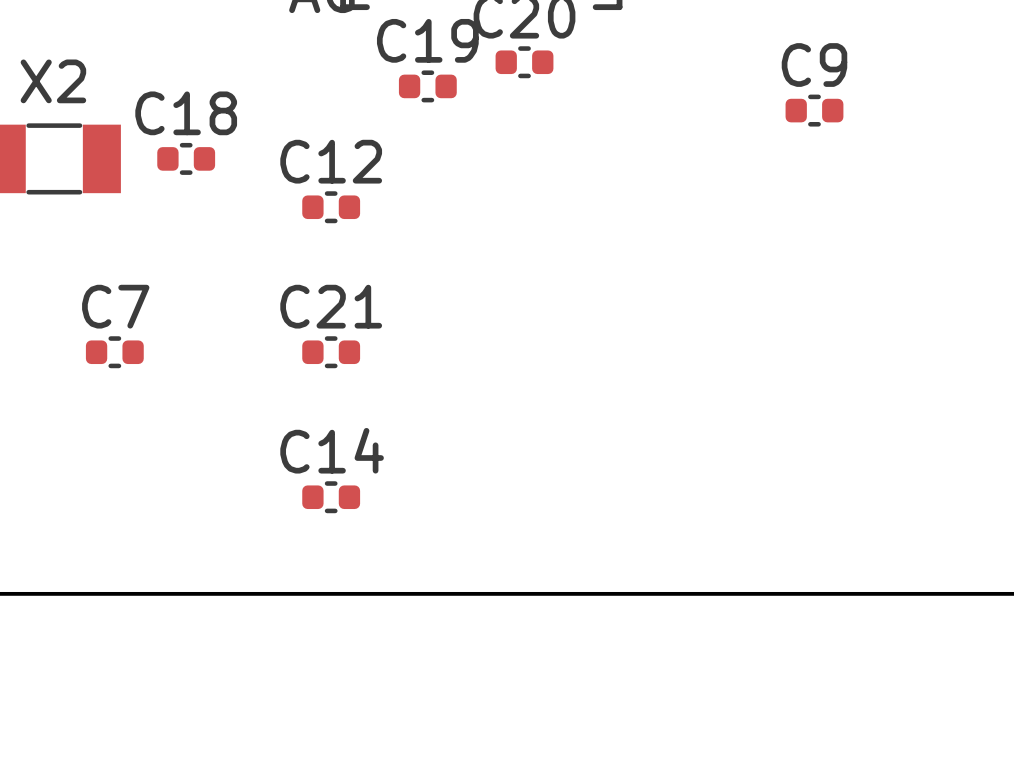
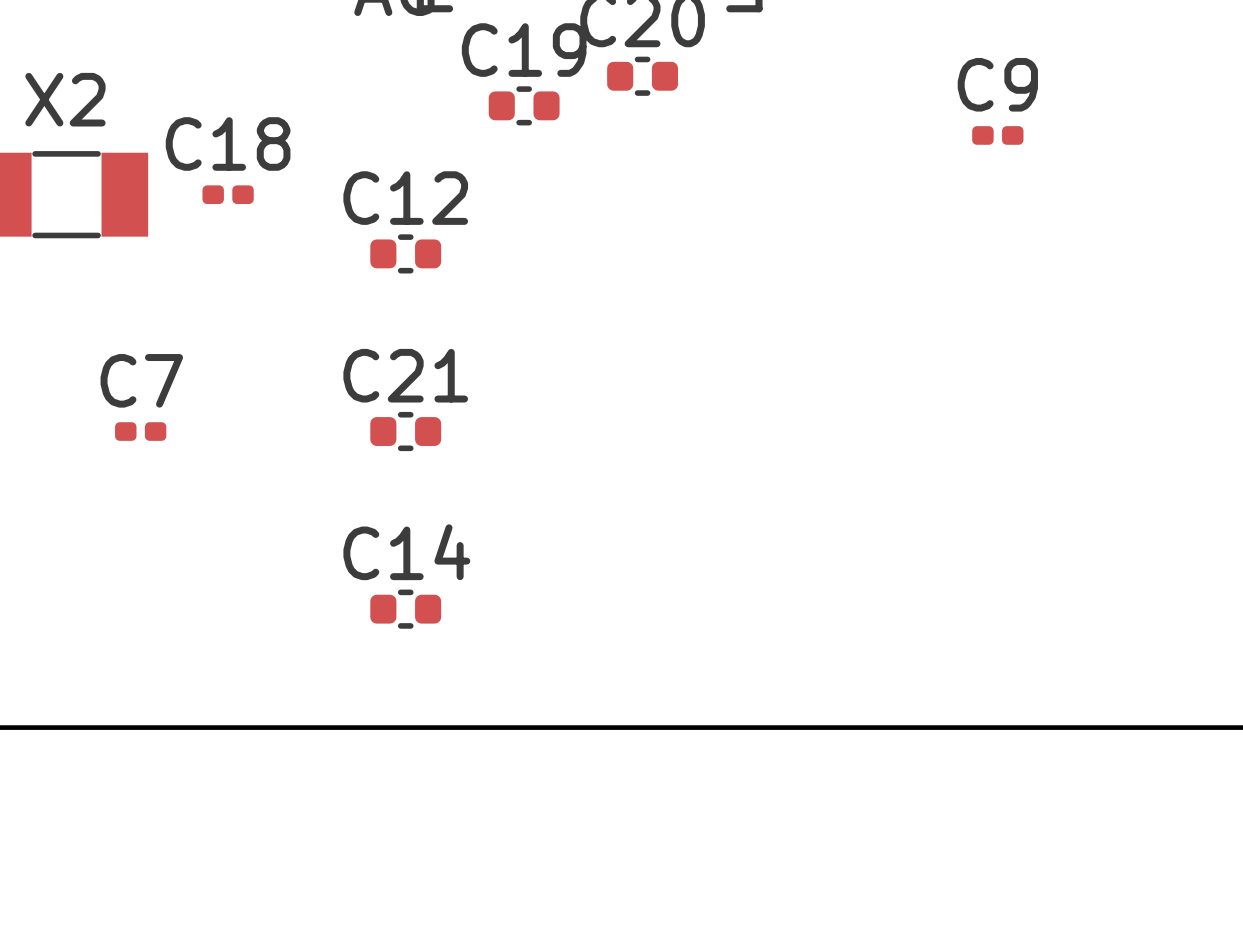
C9 footprint: [785, 94, 844, 127] -> [972, 126, 1024, 145]
C18 footprint: [157, 142, 216, 175] -> [202, 185, 254, 205]
C7 footprint: [85, 336, 144, 369] -> [115, 422, 167, 441]

